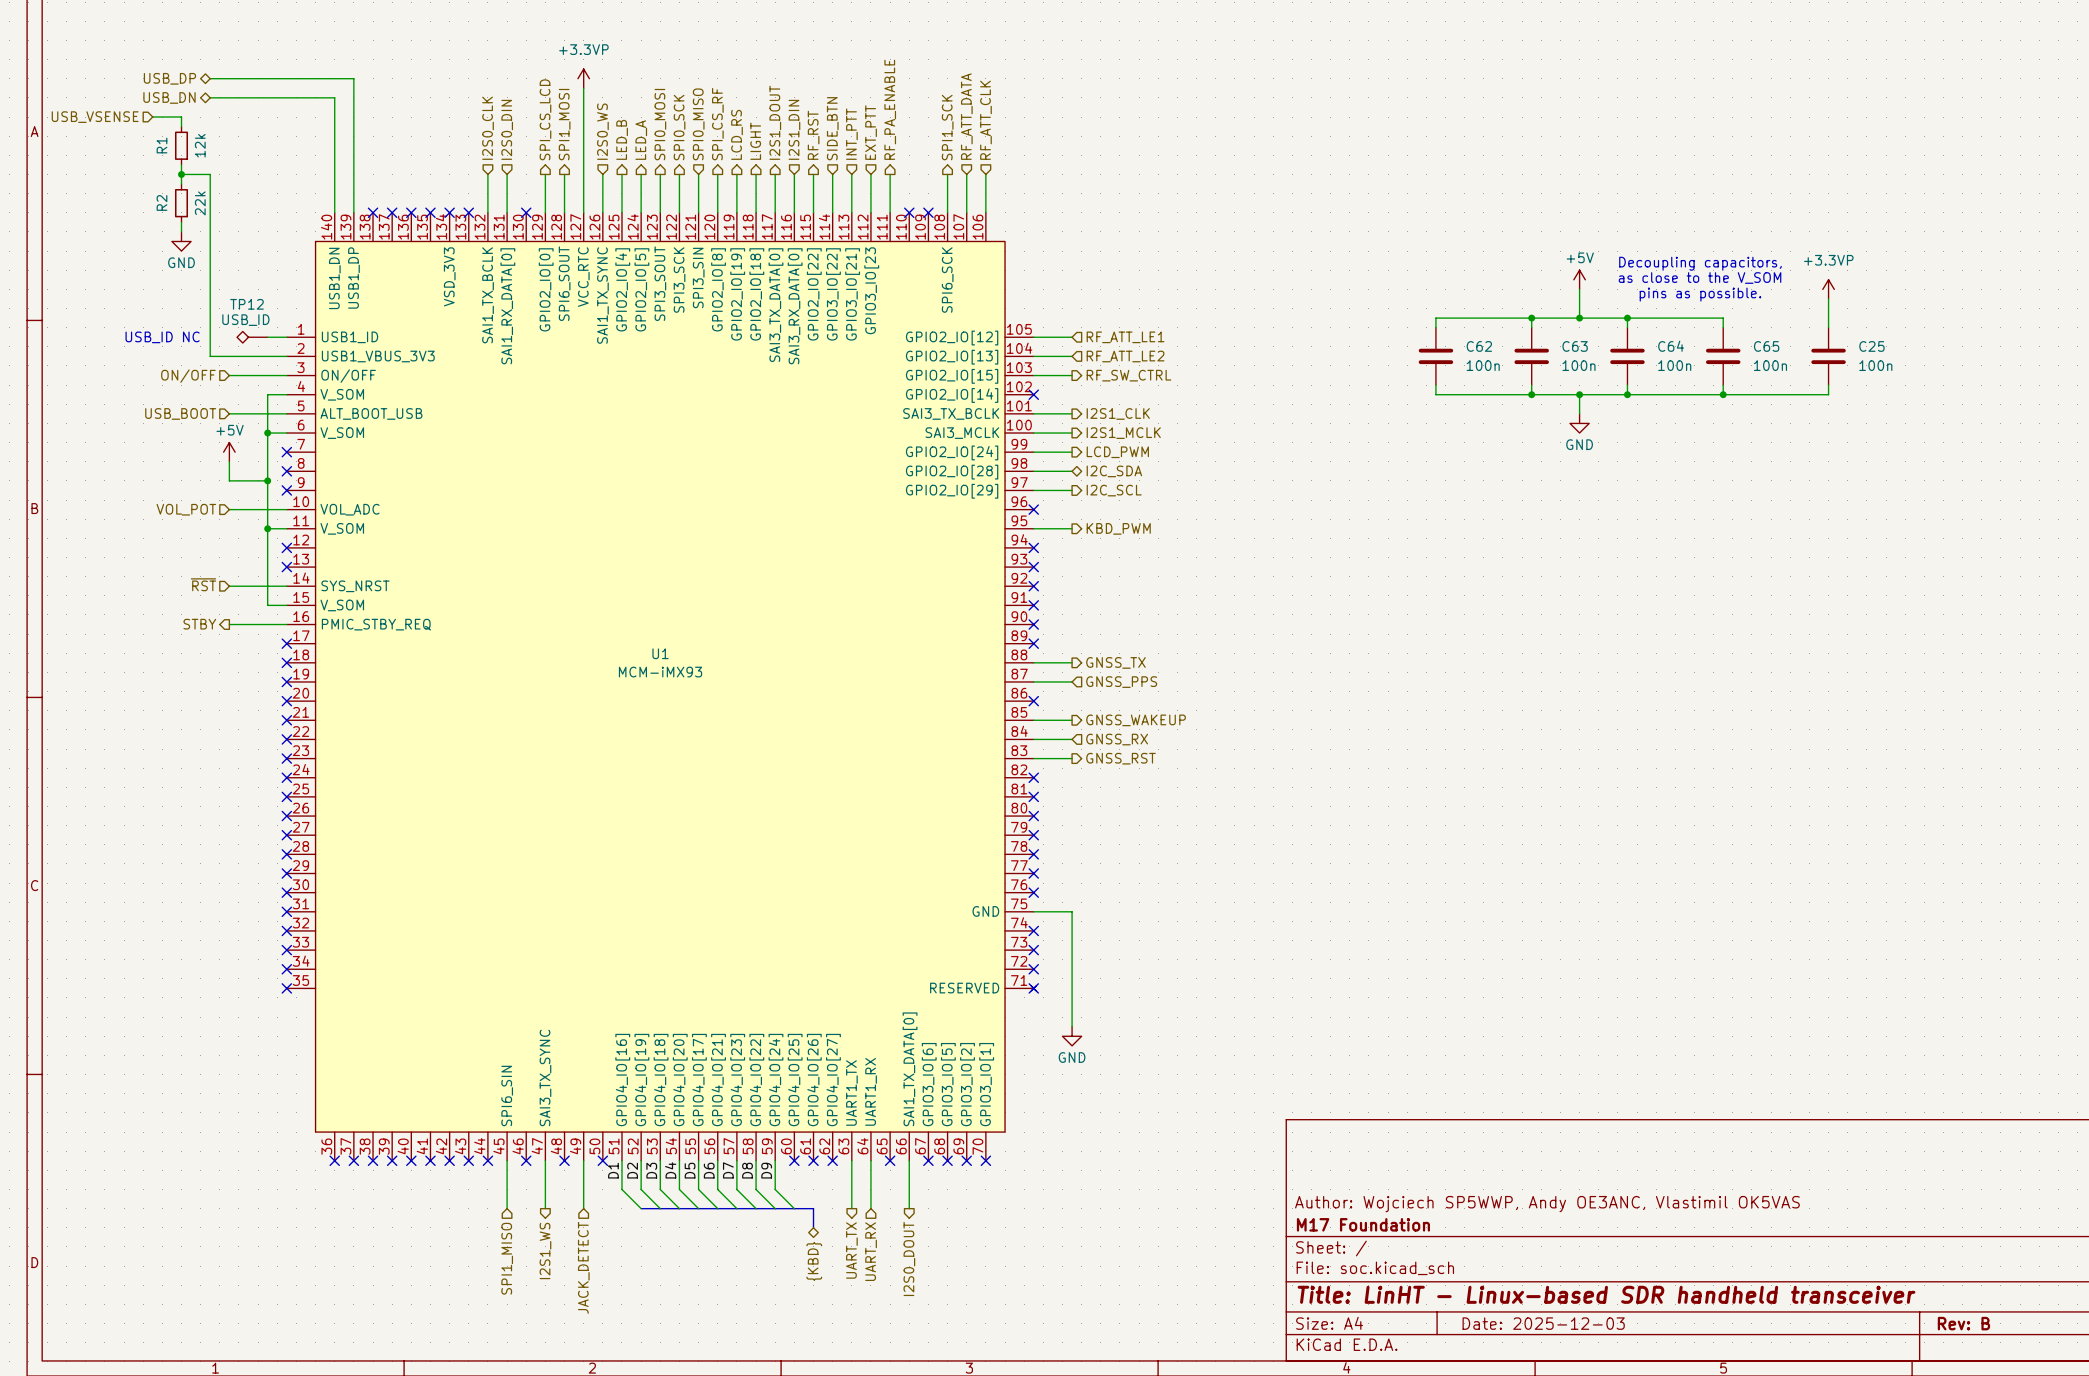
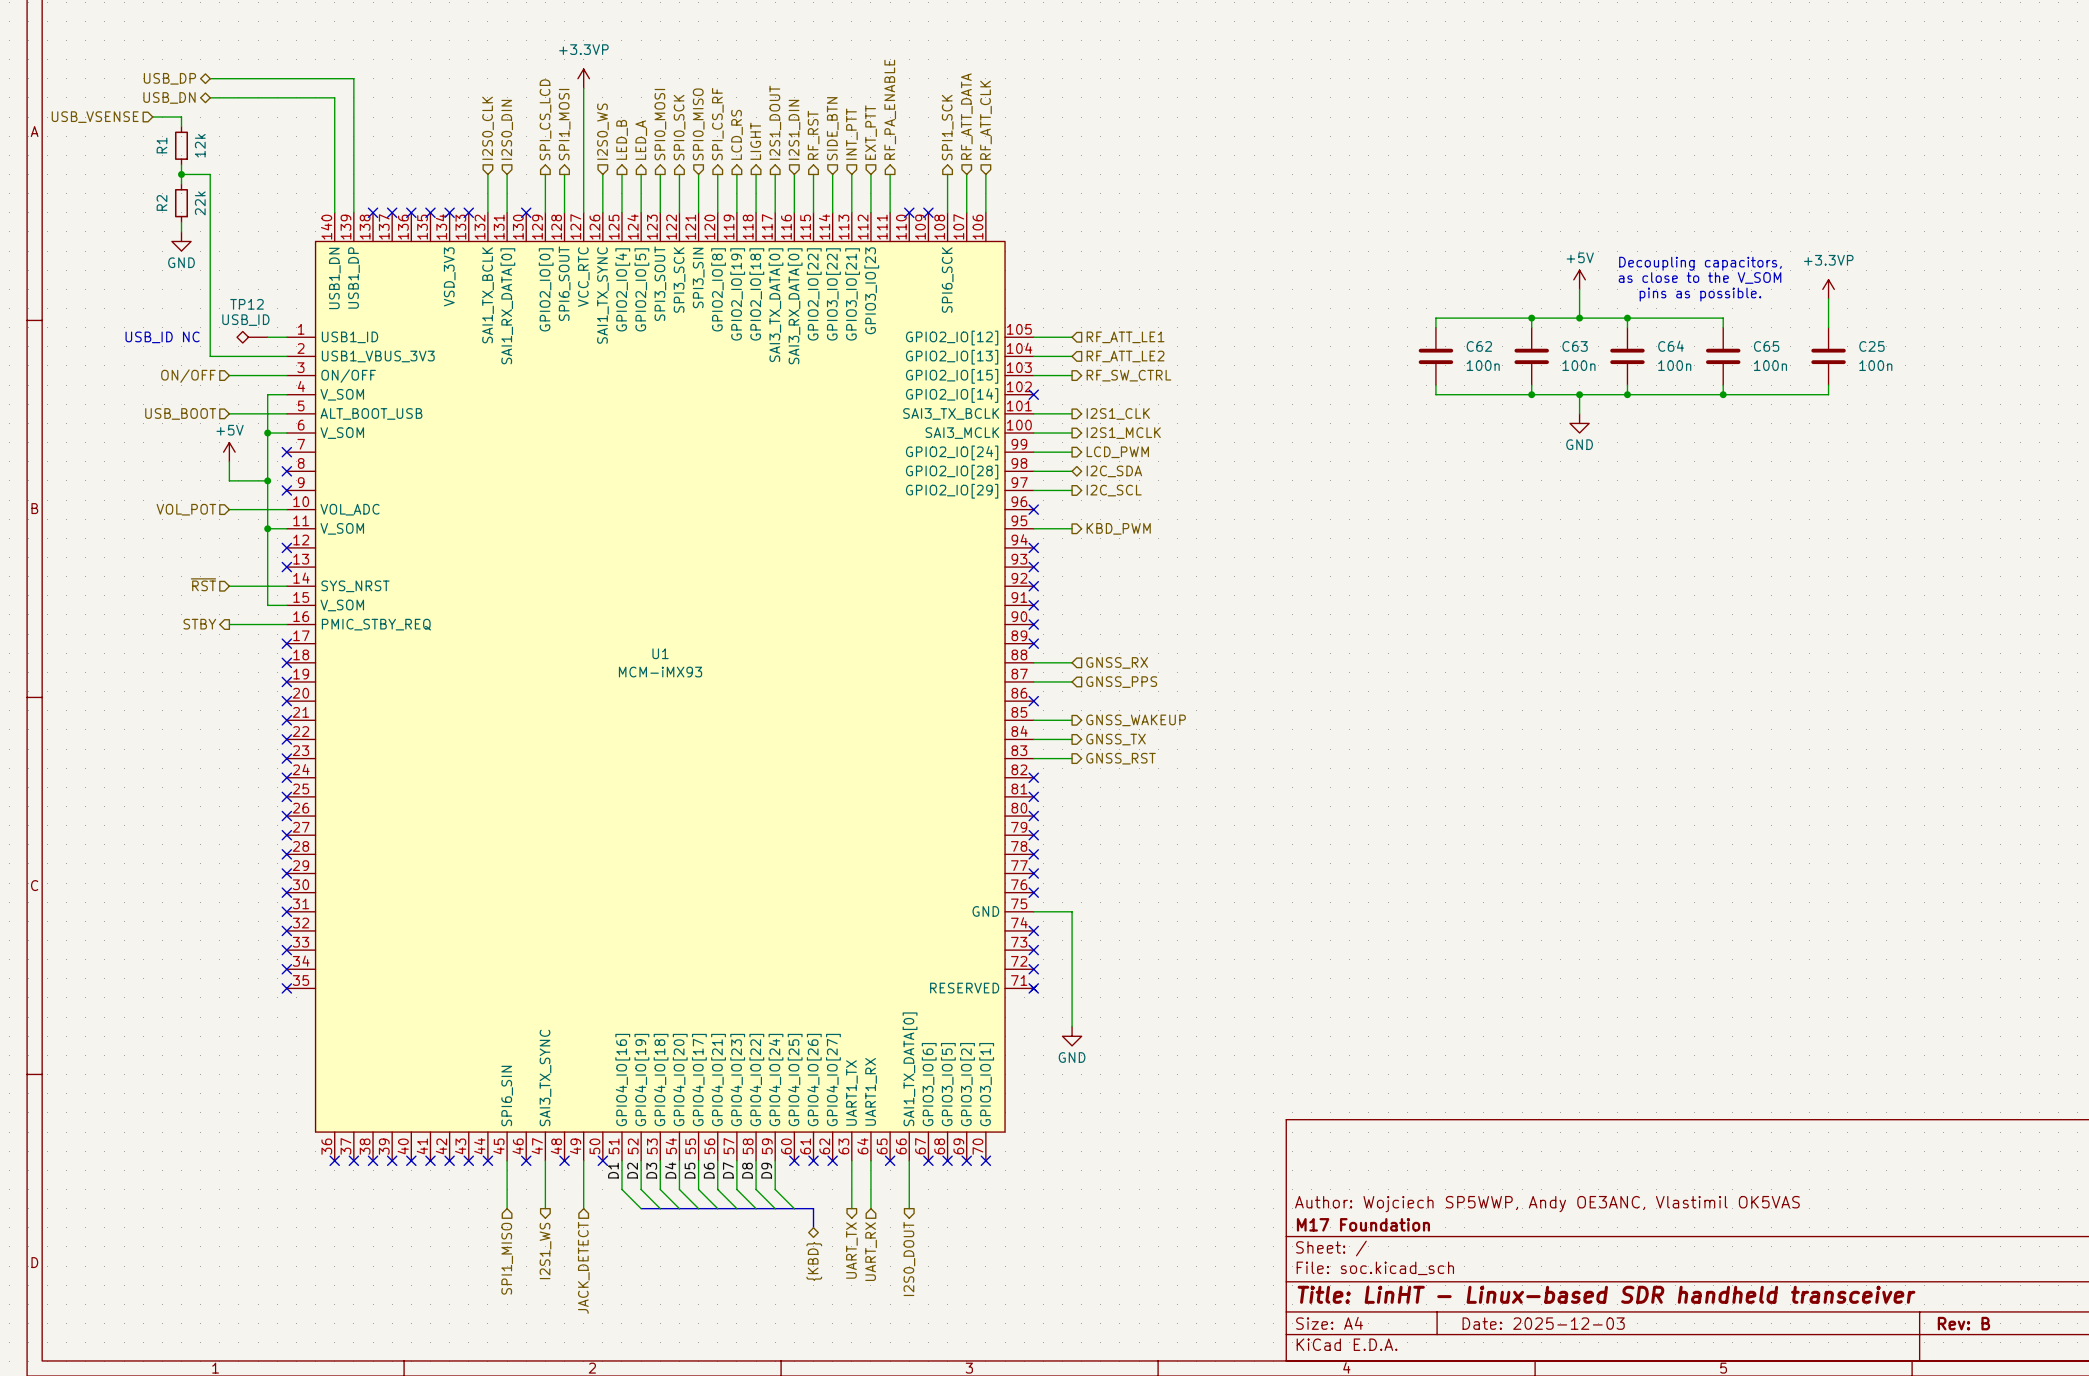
hierarchical label shape: output (1115, 662) -> input (1117, 662)
hierarchical label: GNSS_TX (1115, 662) -> GNSS_RX (1117, 662)
hierarchical label shape: input (1117, 739) -> output (1115, 739)
hierarchical label: GNSS_RX (1117, 739) -> GNSS_TX (1115, 739)

